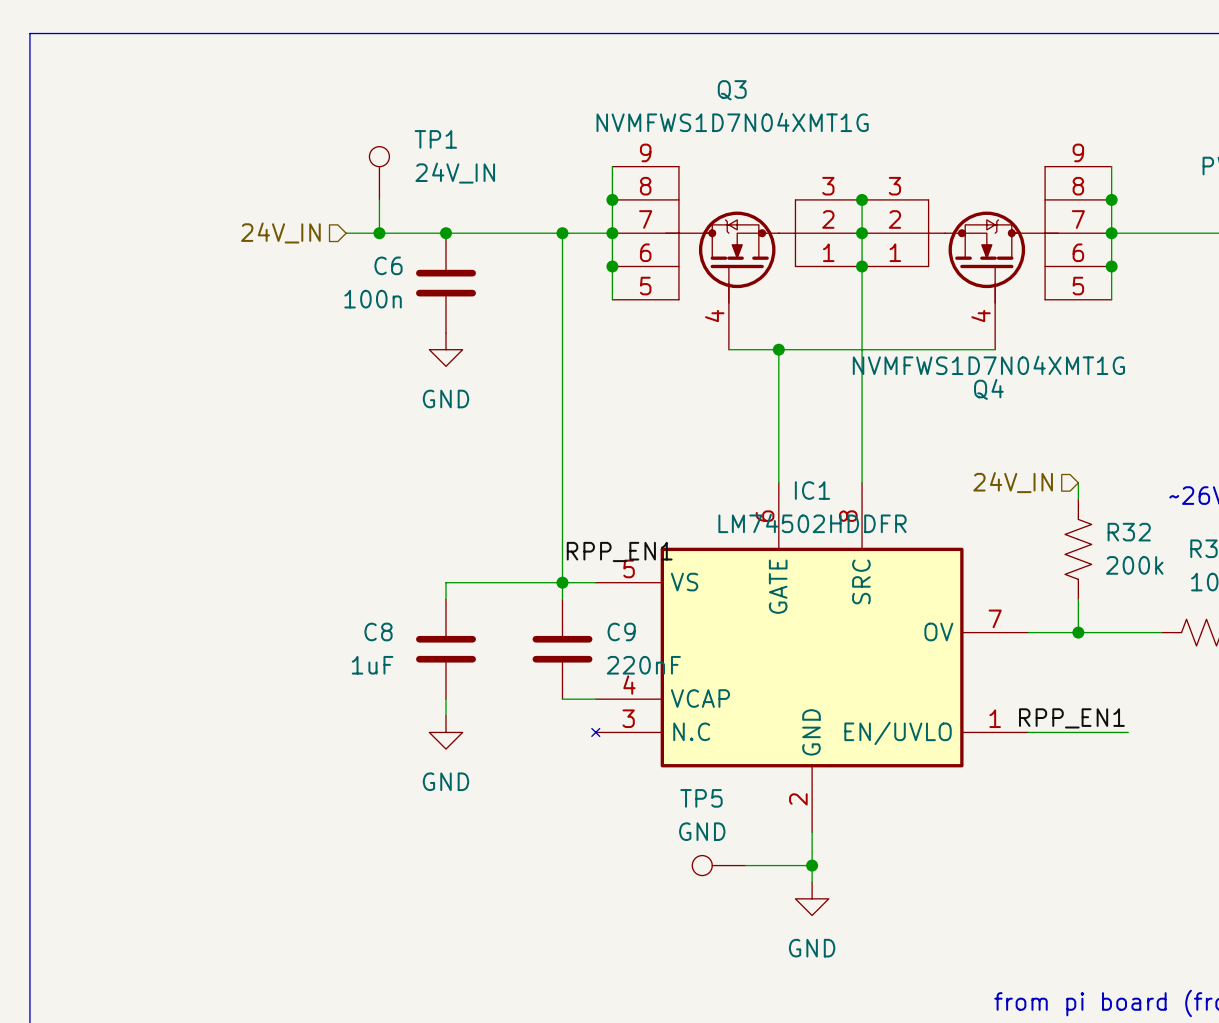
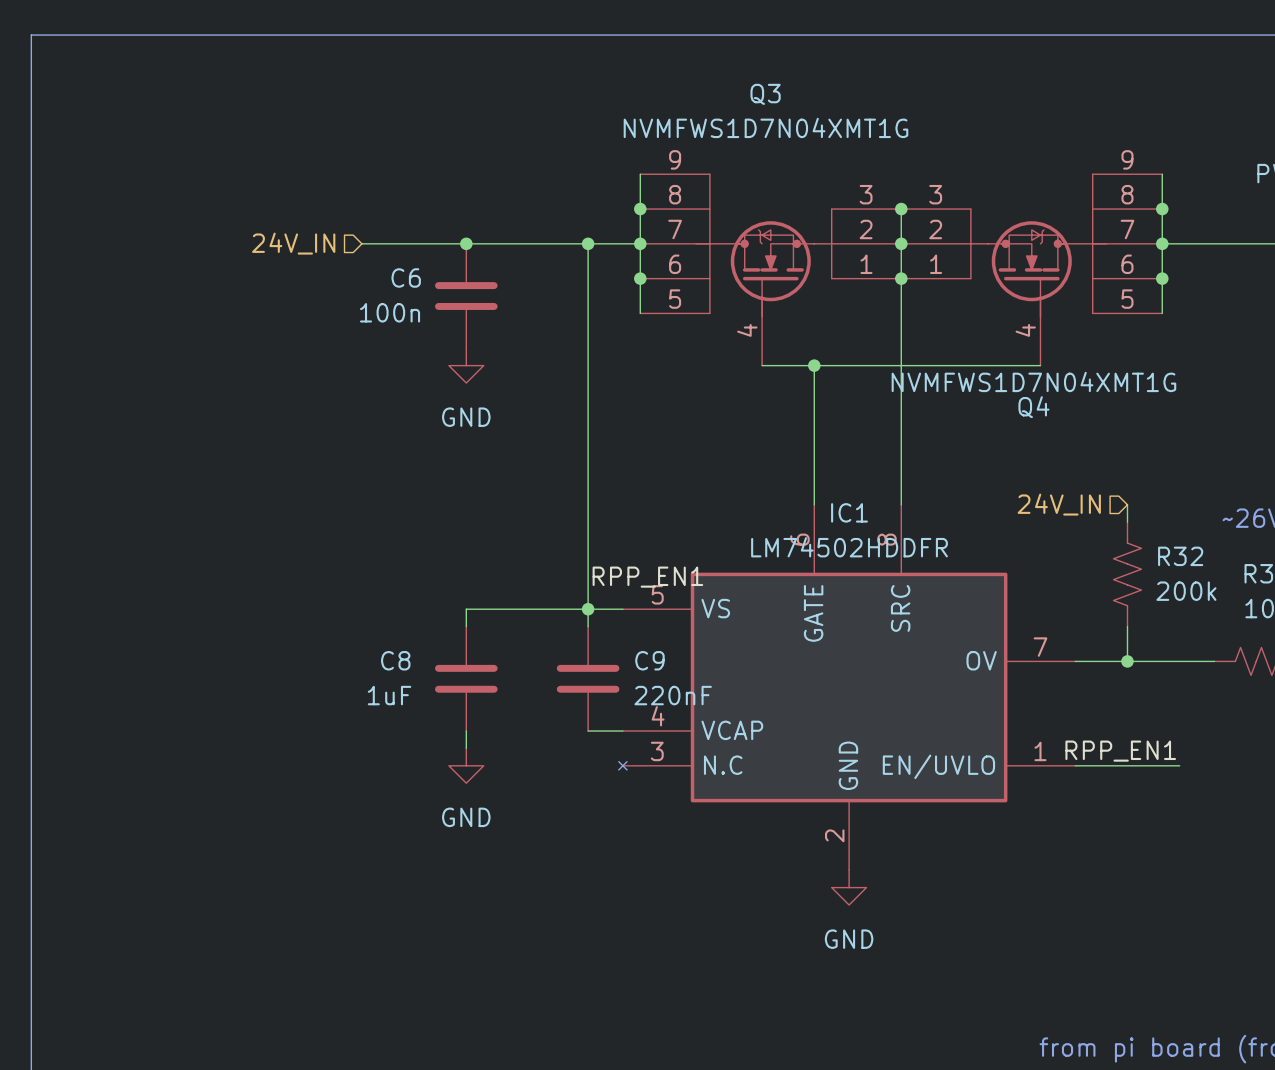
TP1: 24V_IN (379, 173) -> none
wire: (379, 199) (379, 233) -> none
junction: (379, 233) -> none
wire: (812, 832) (812, 882) -> none
TP5: GND (718, 865) -> none
wire: (745, 865) (812, 865) -> none
junction: (812, 865) -> none
power symbol position: GND (812, 898) -> GND (849, 887)

